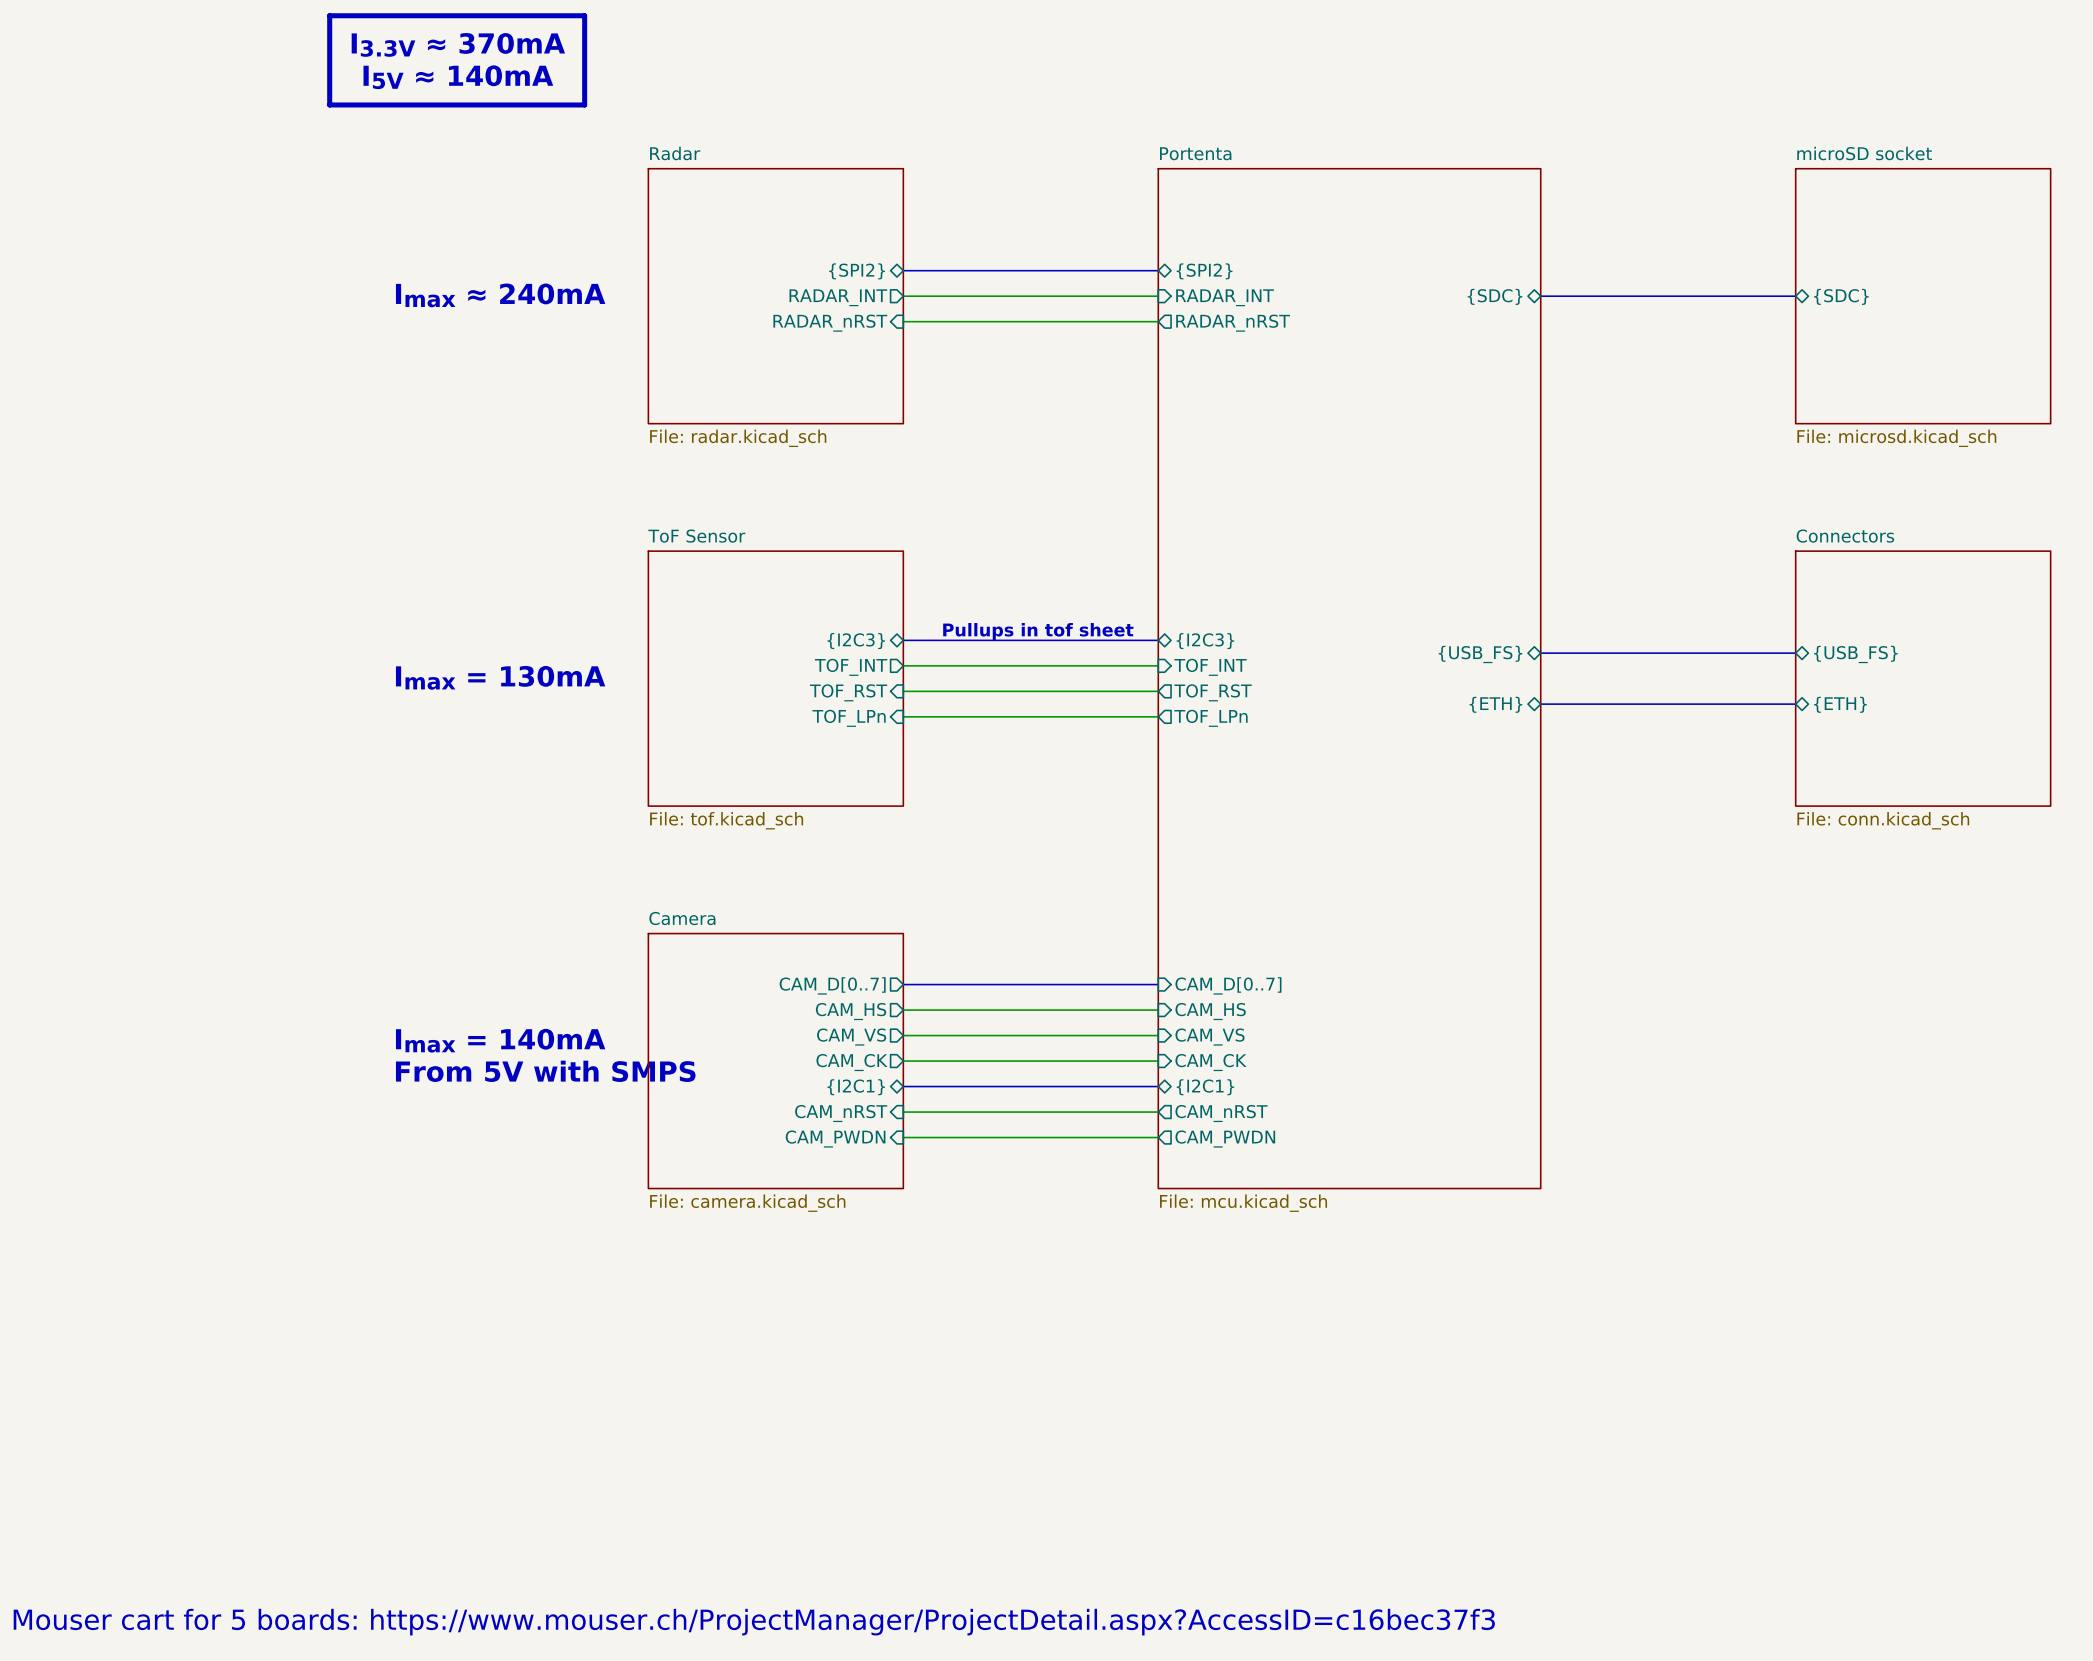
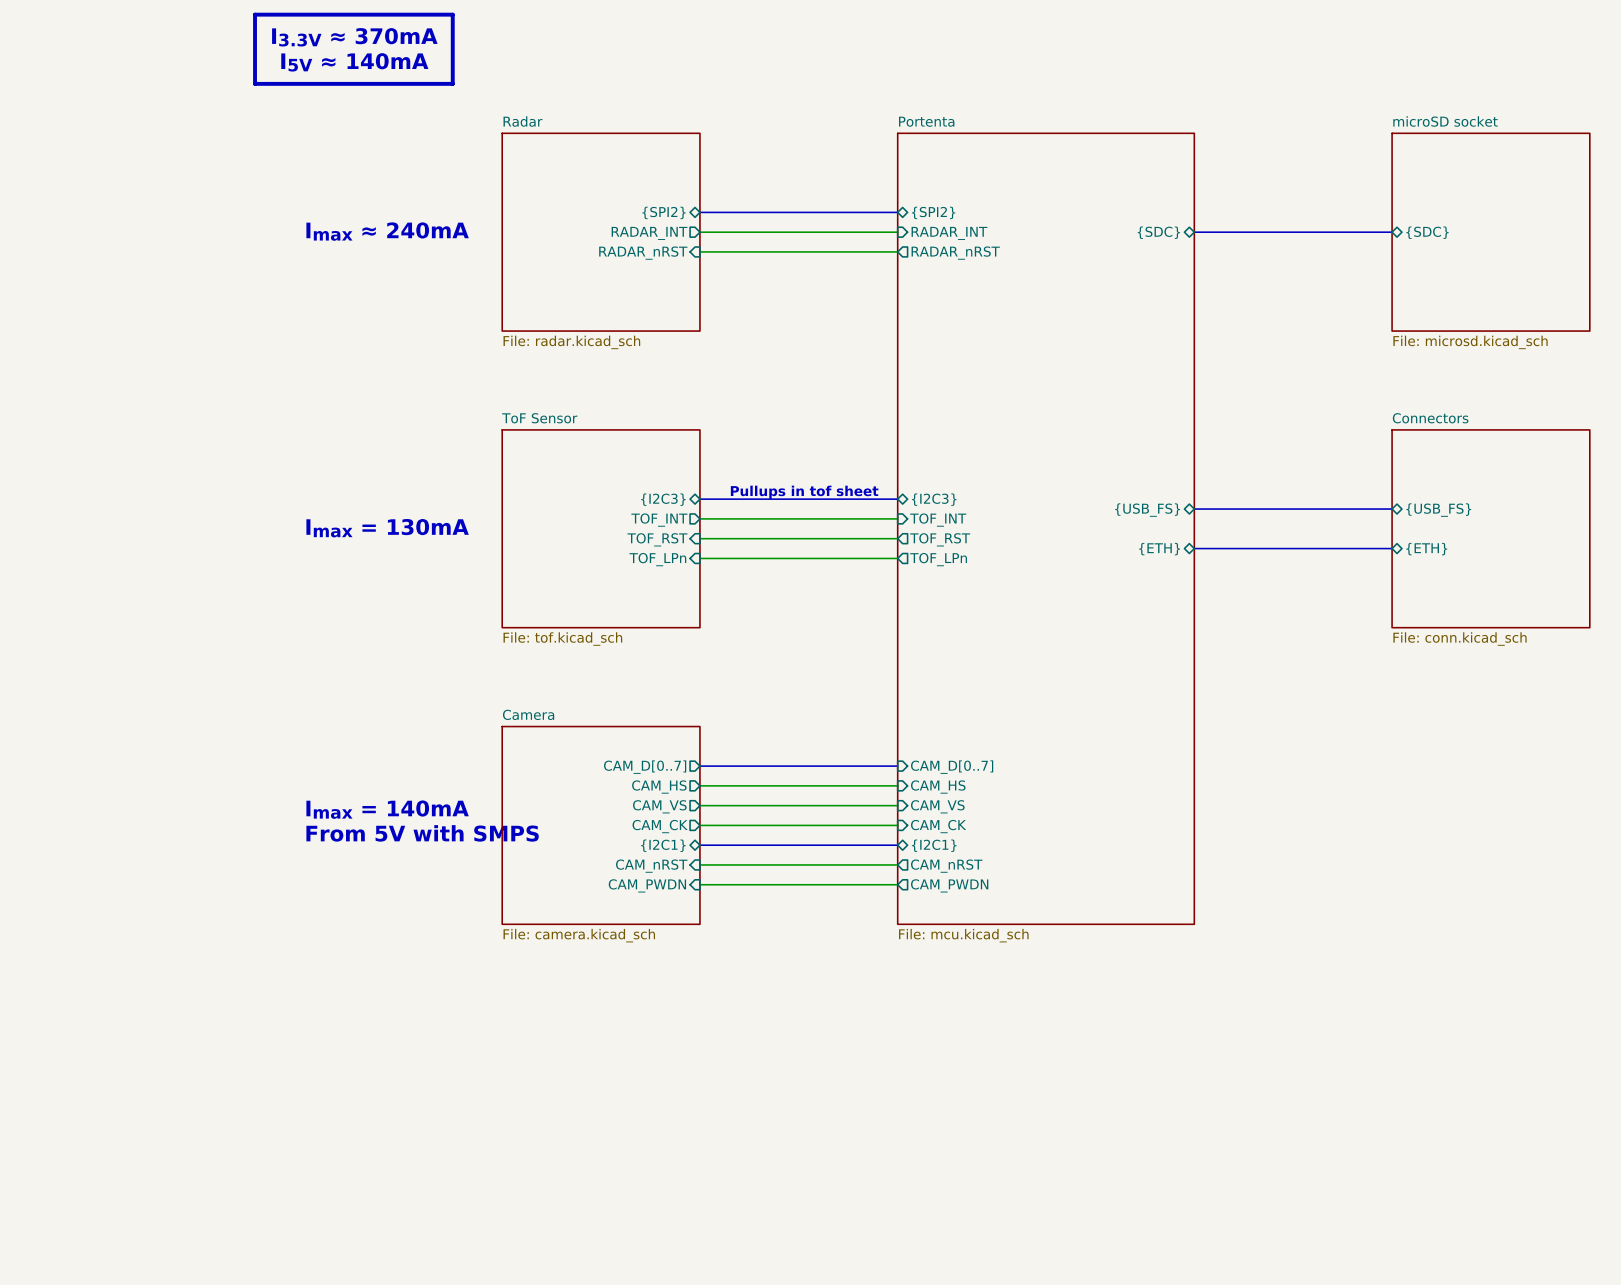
text: Mouser cart for 5 boards: https://www.mouser.ch/ProjectManager/ProjectDetail.aspx?AccessID=c16bec37f3 (754, 1622) -> none

